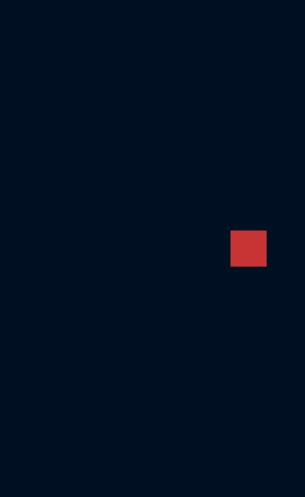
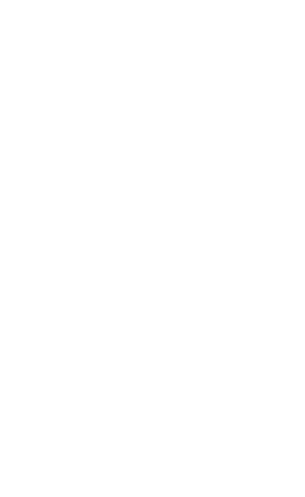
part: (248, 248) -> none

